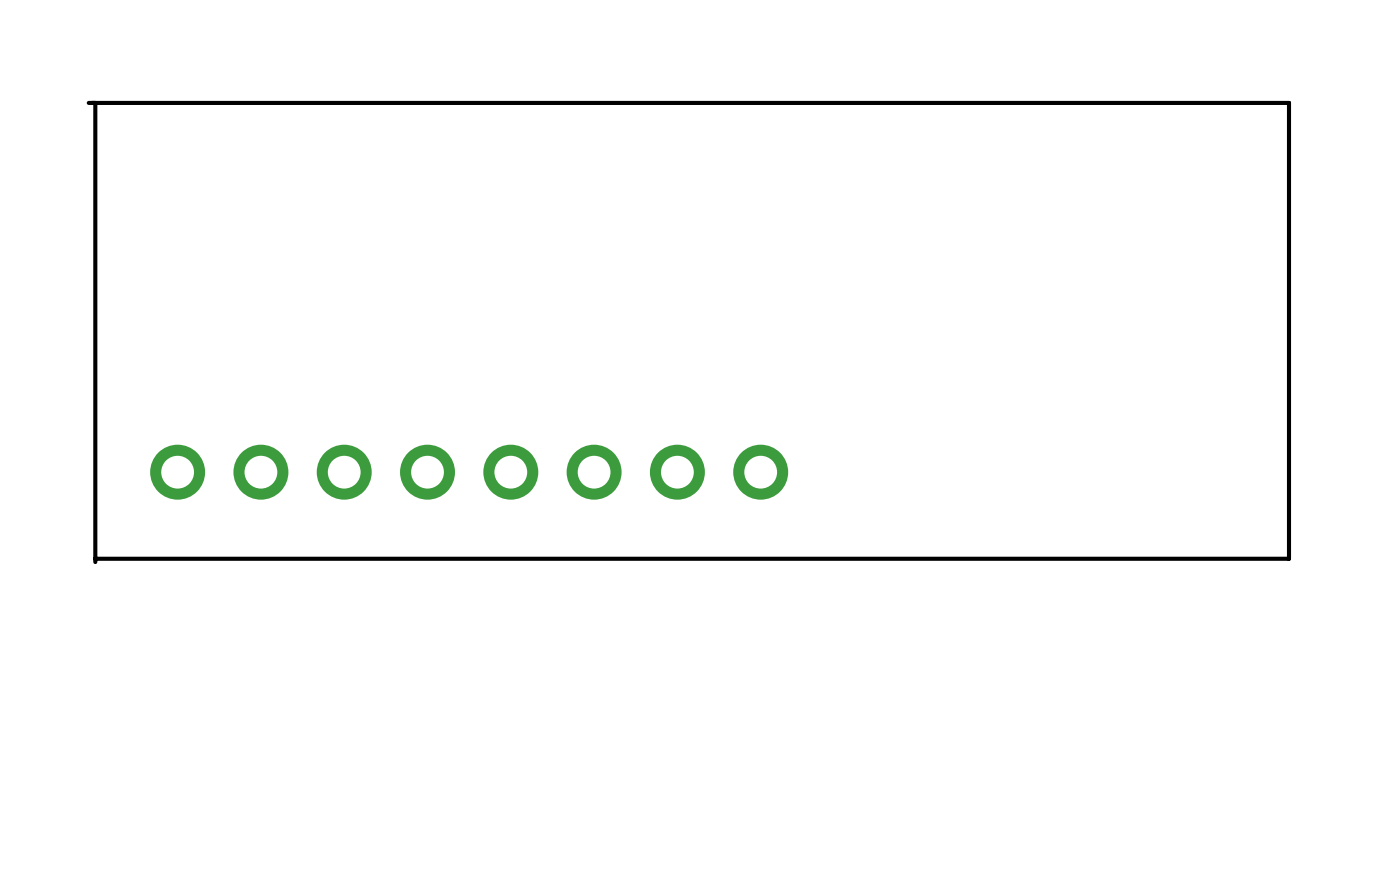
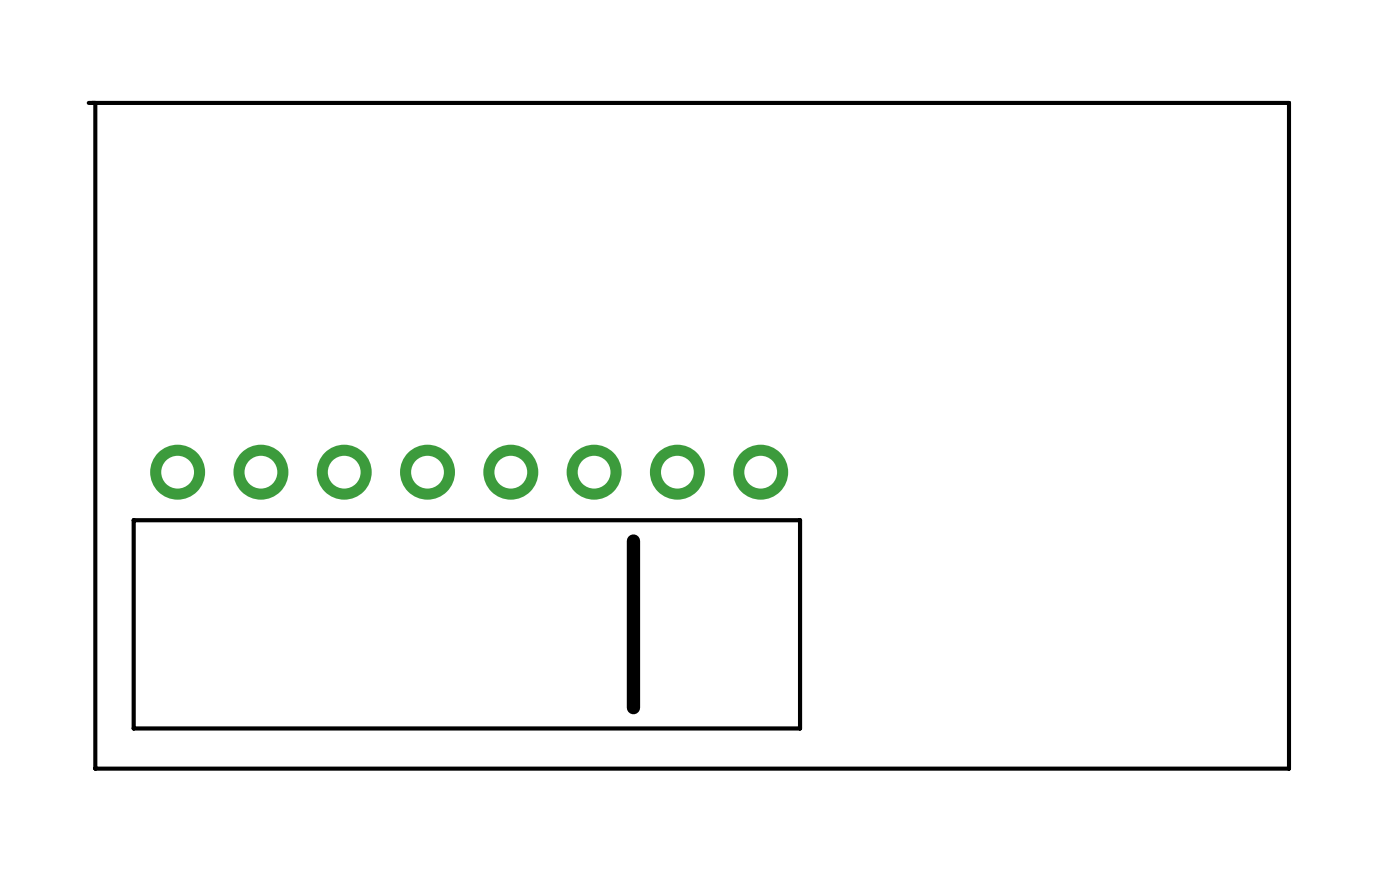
board edge: (1289, 558) (95, 558) -> (1289, 558) (1289, 768) (95, 768) (95, 562)
part: none -> (466, 624)

